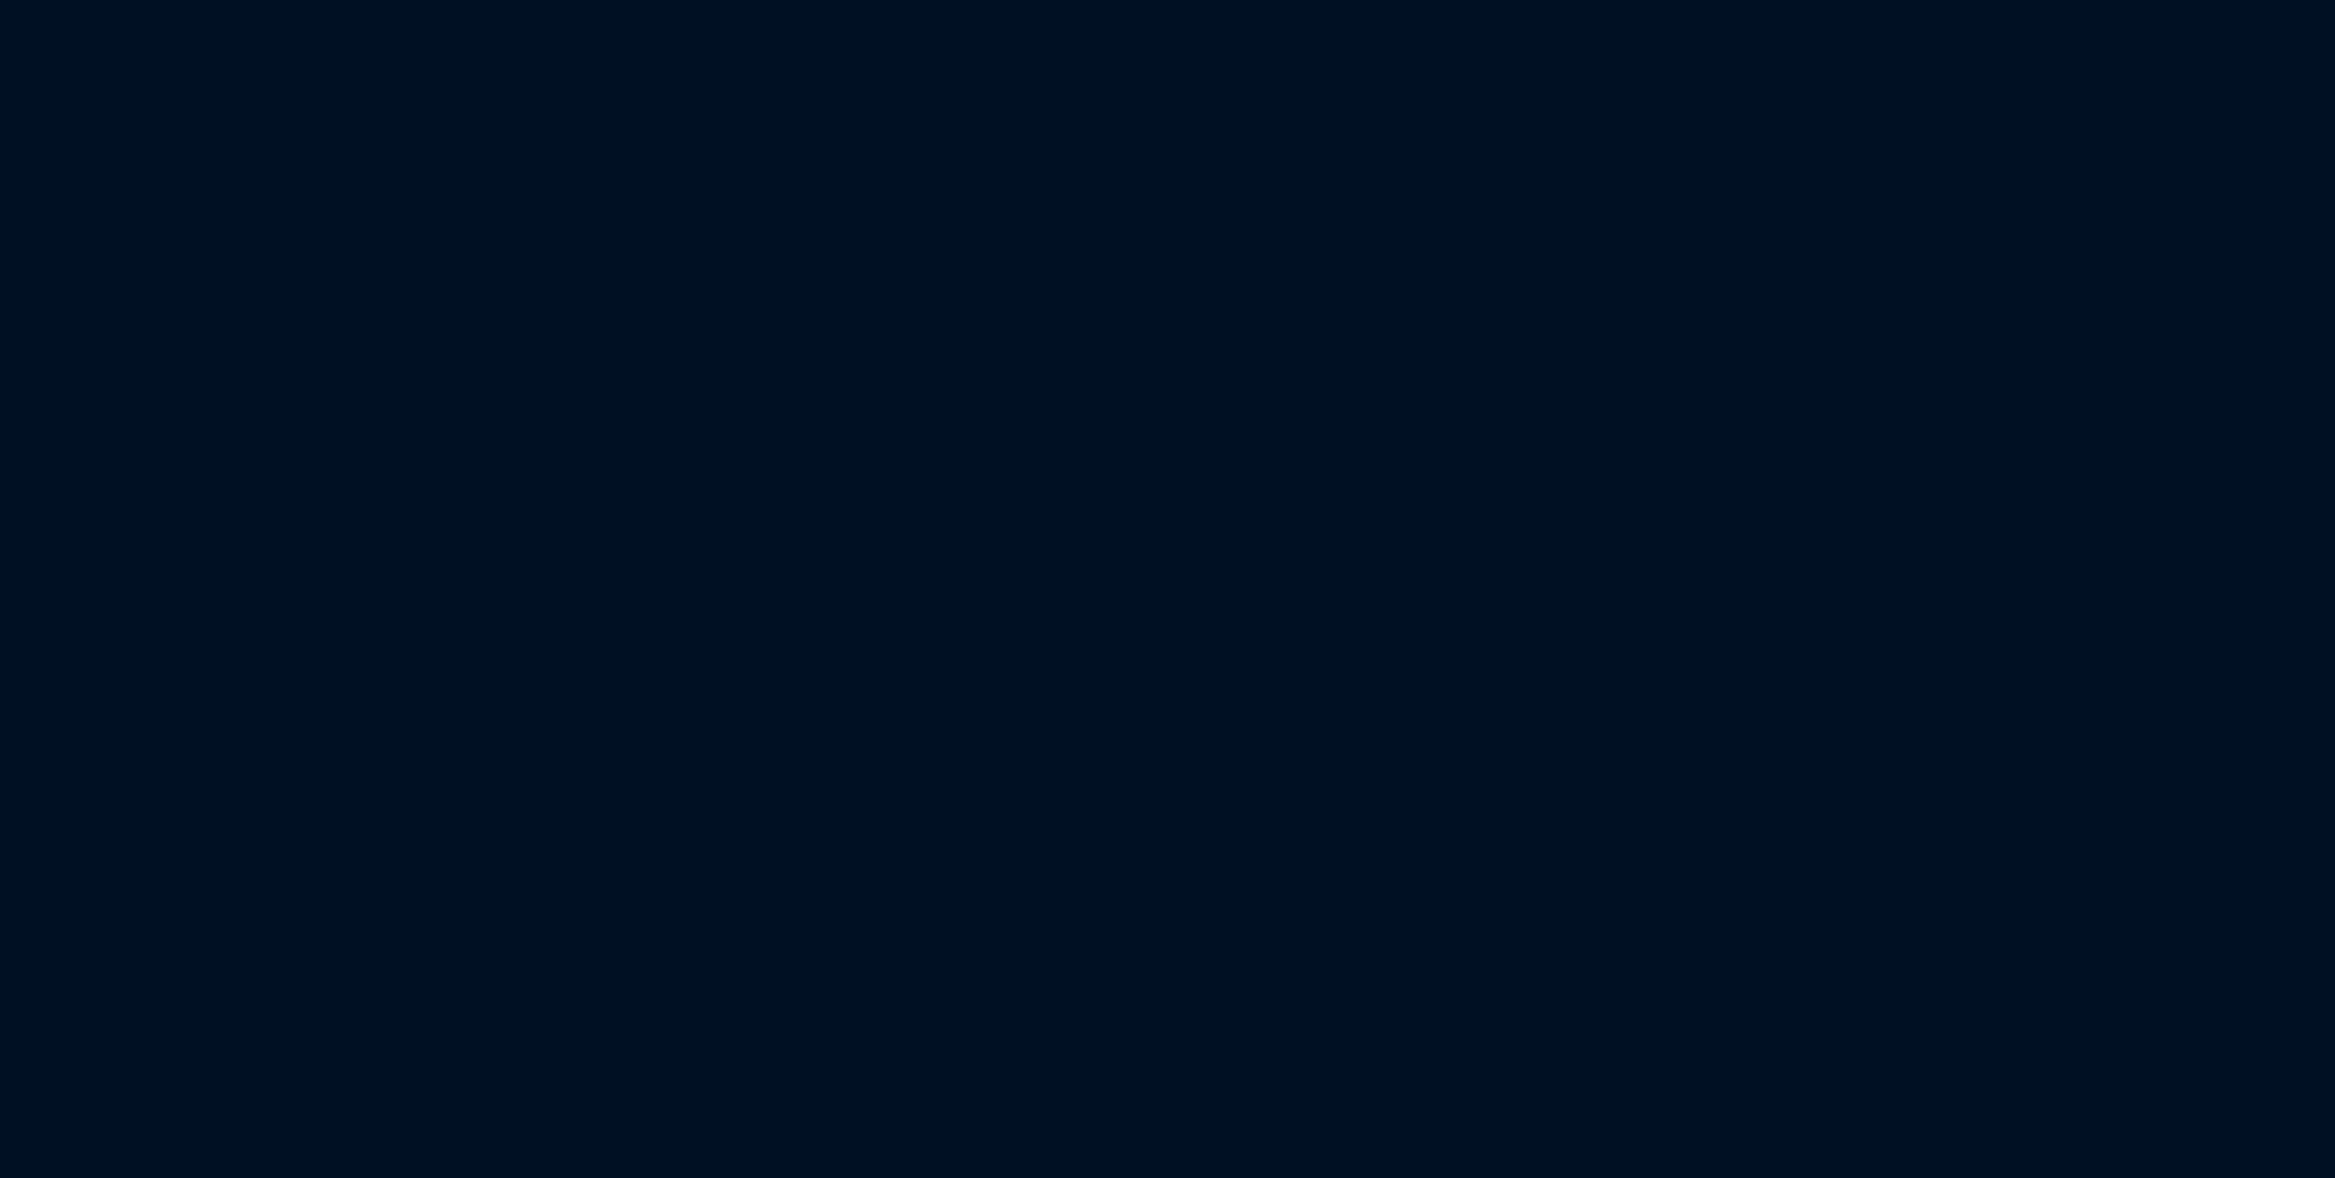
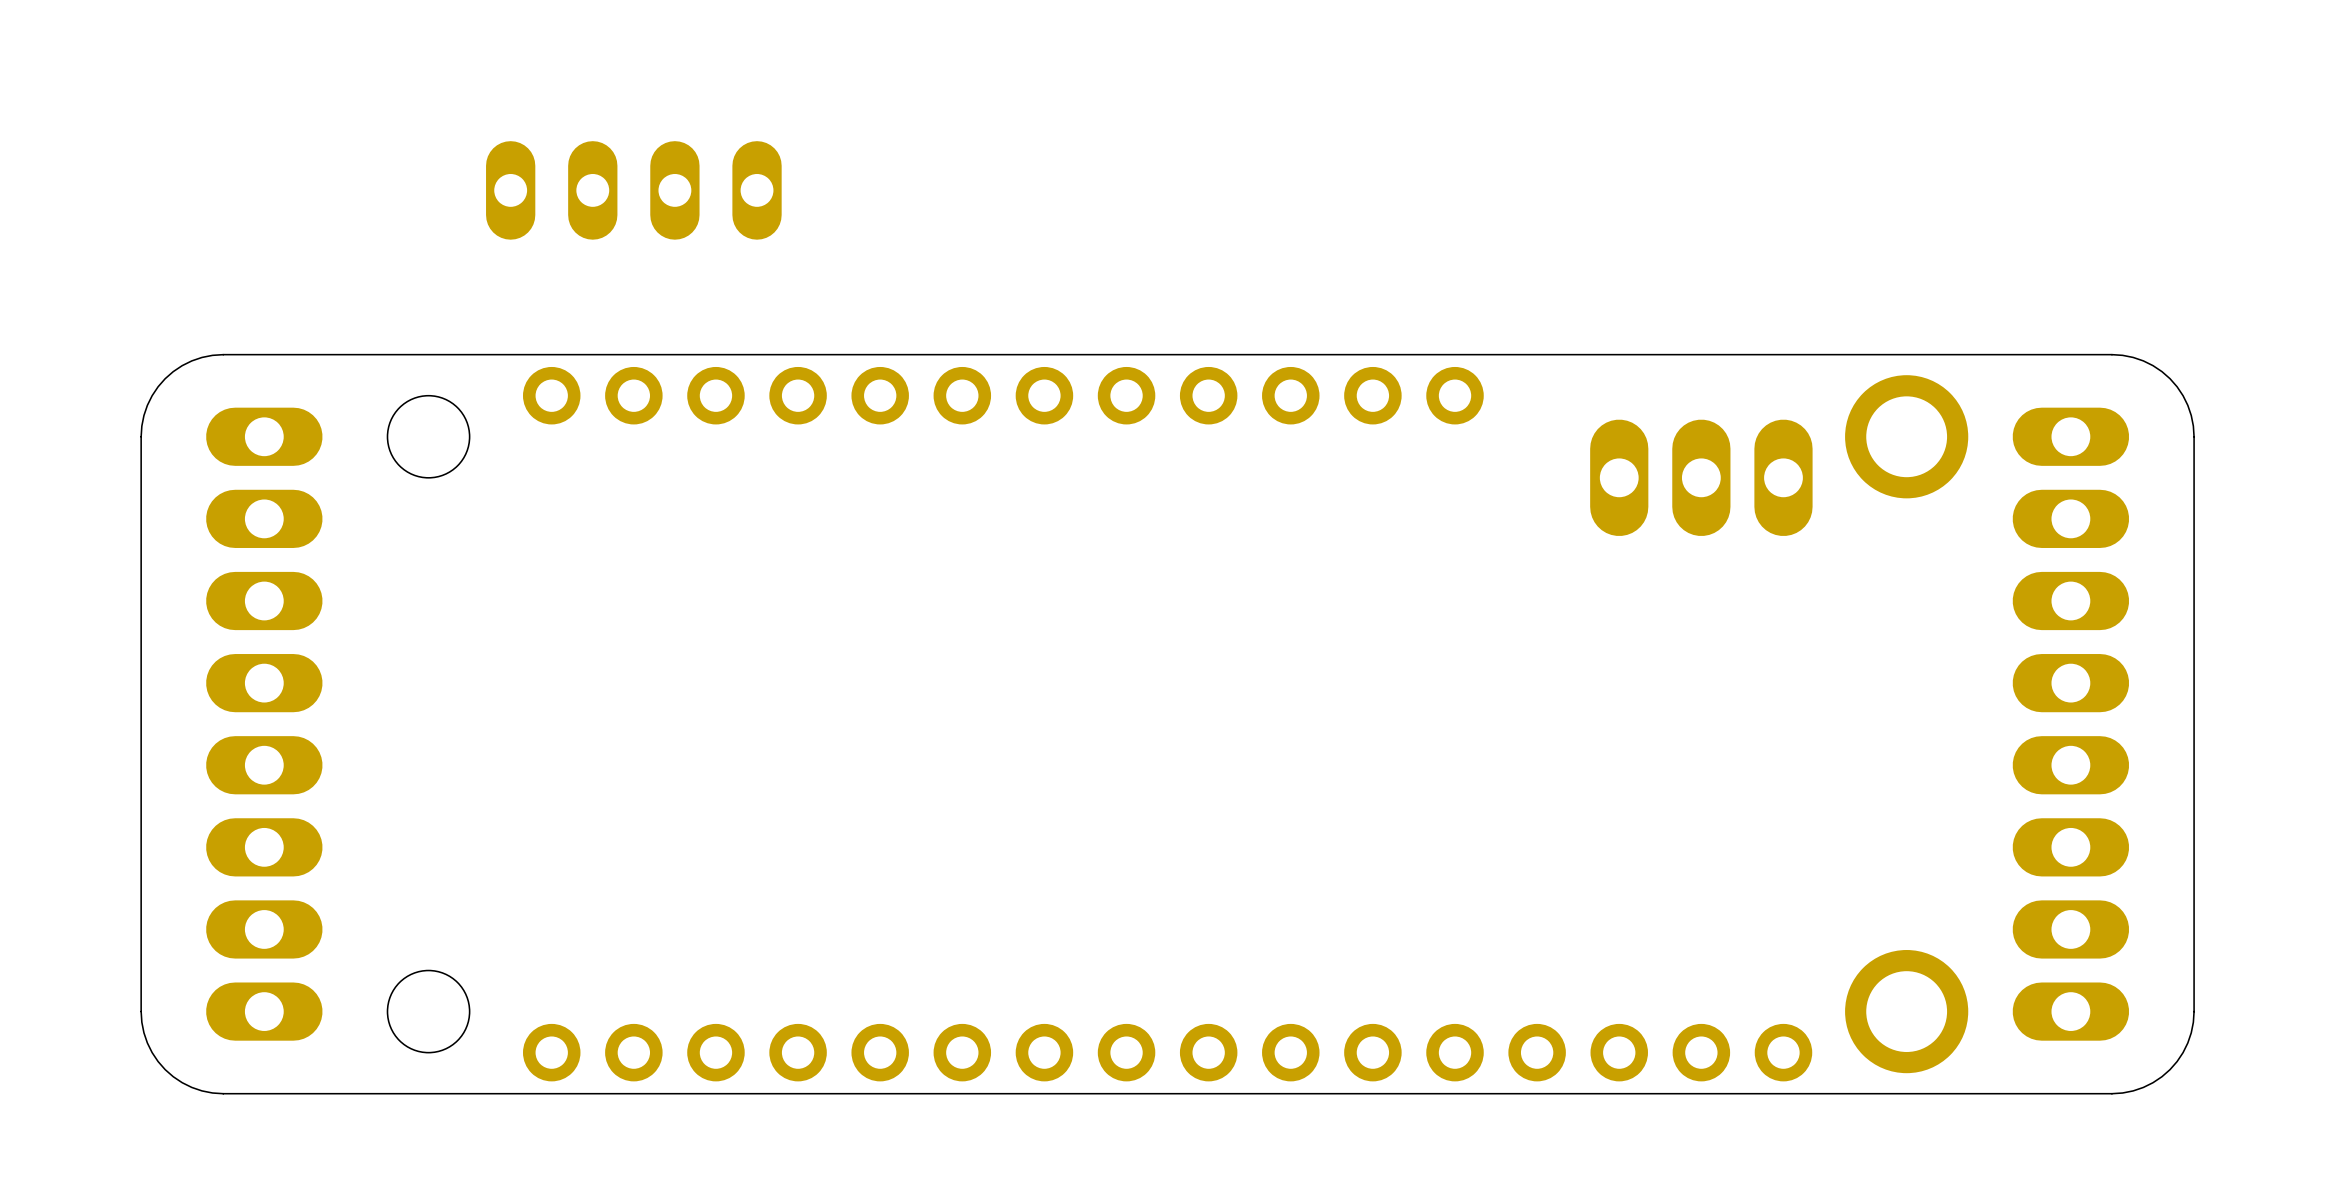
part: none -> (633, 190)
part: none -> (1701, 477)
part: none -> (264, 724)
part: none -> (1167, 724)
part: none -> (2070, 724)

